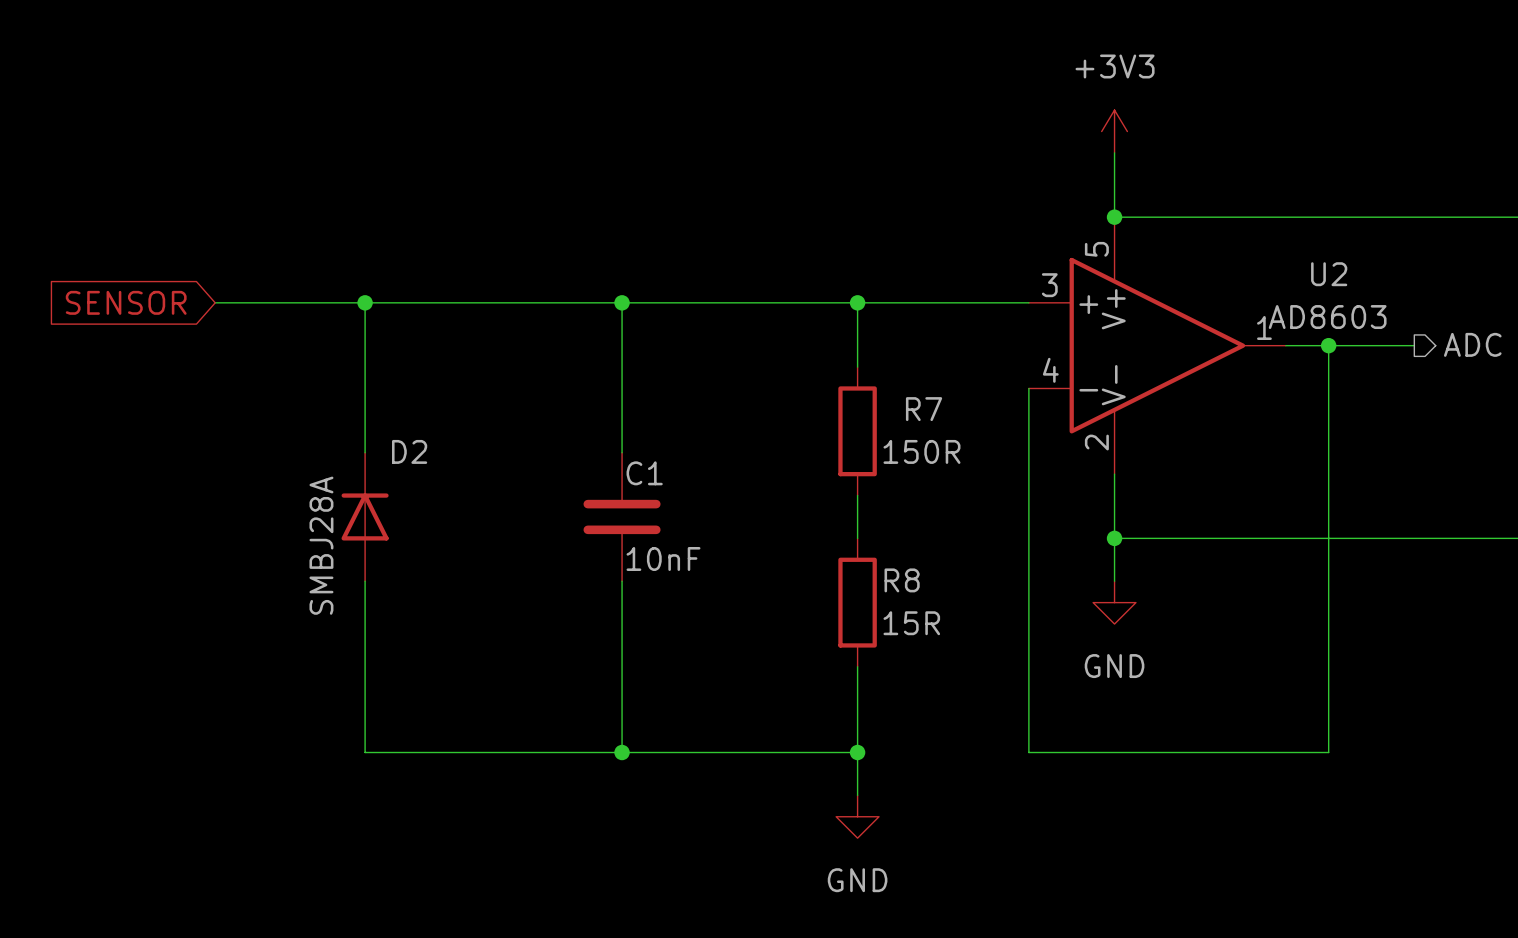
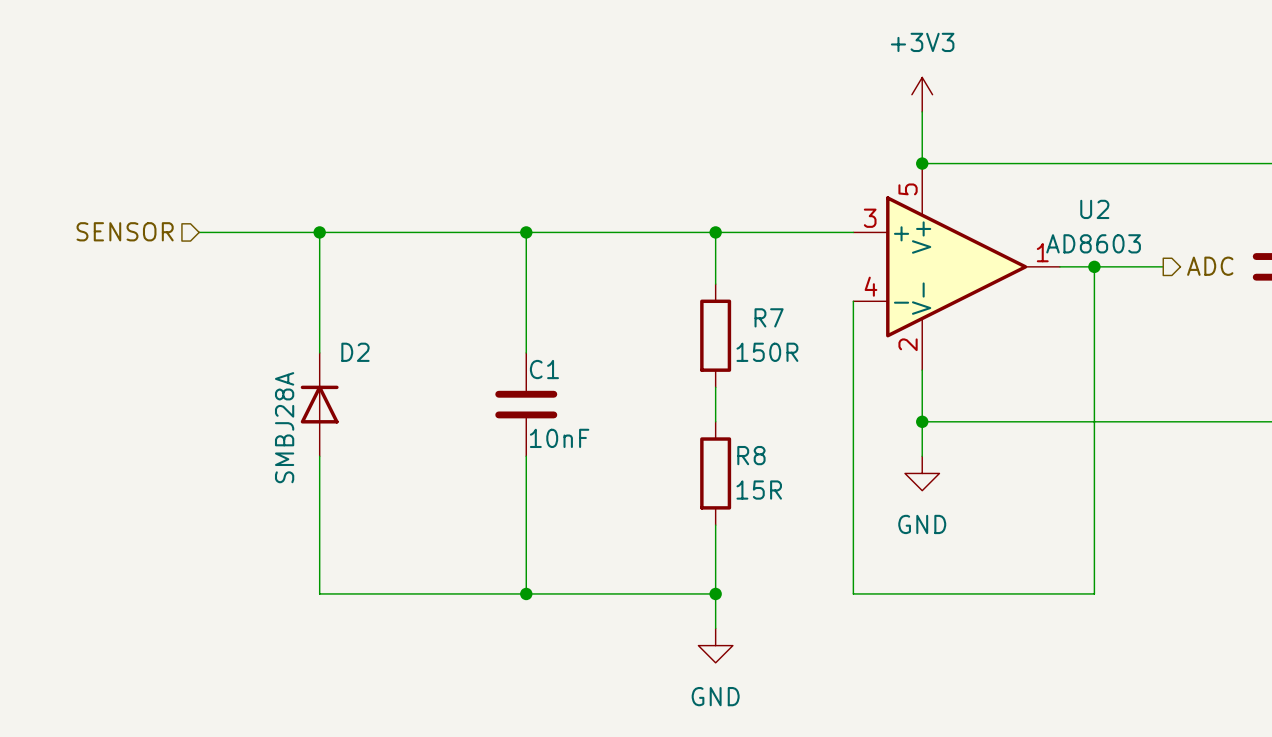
hierarchical label: none -> SENSOR (125, 231)
global label: SENSOR (126, 302) -> none

